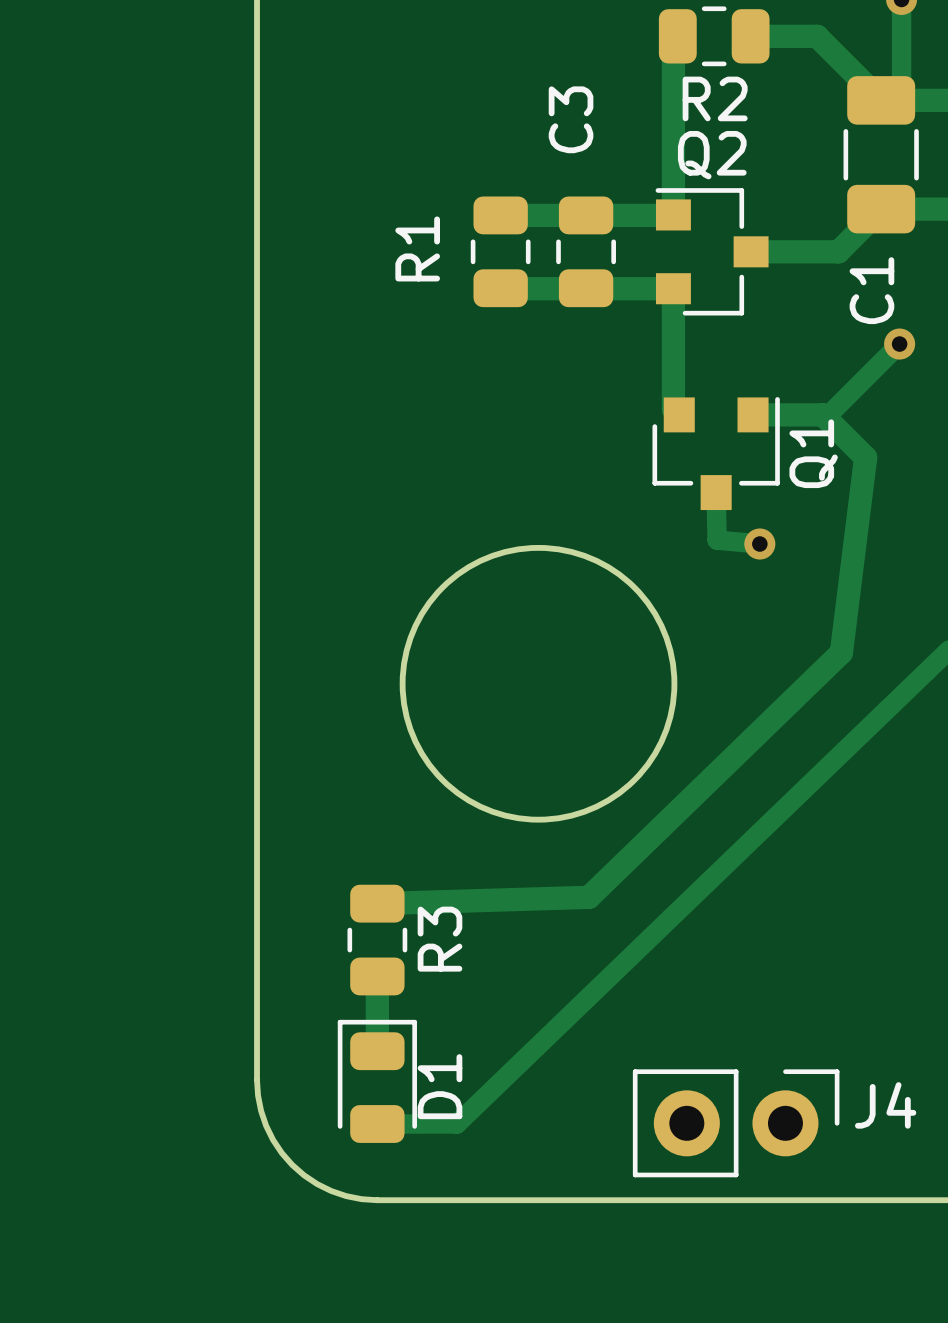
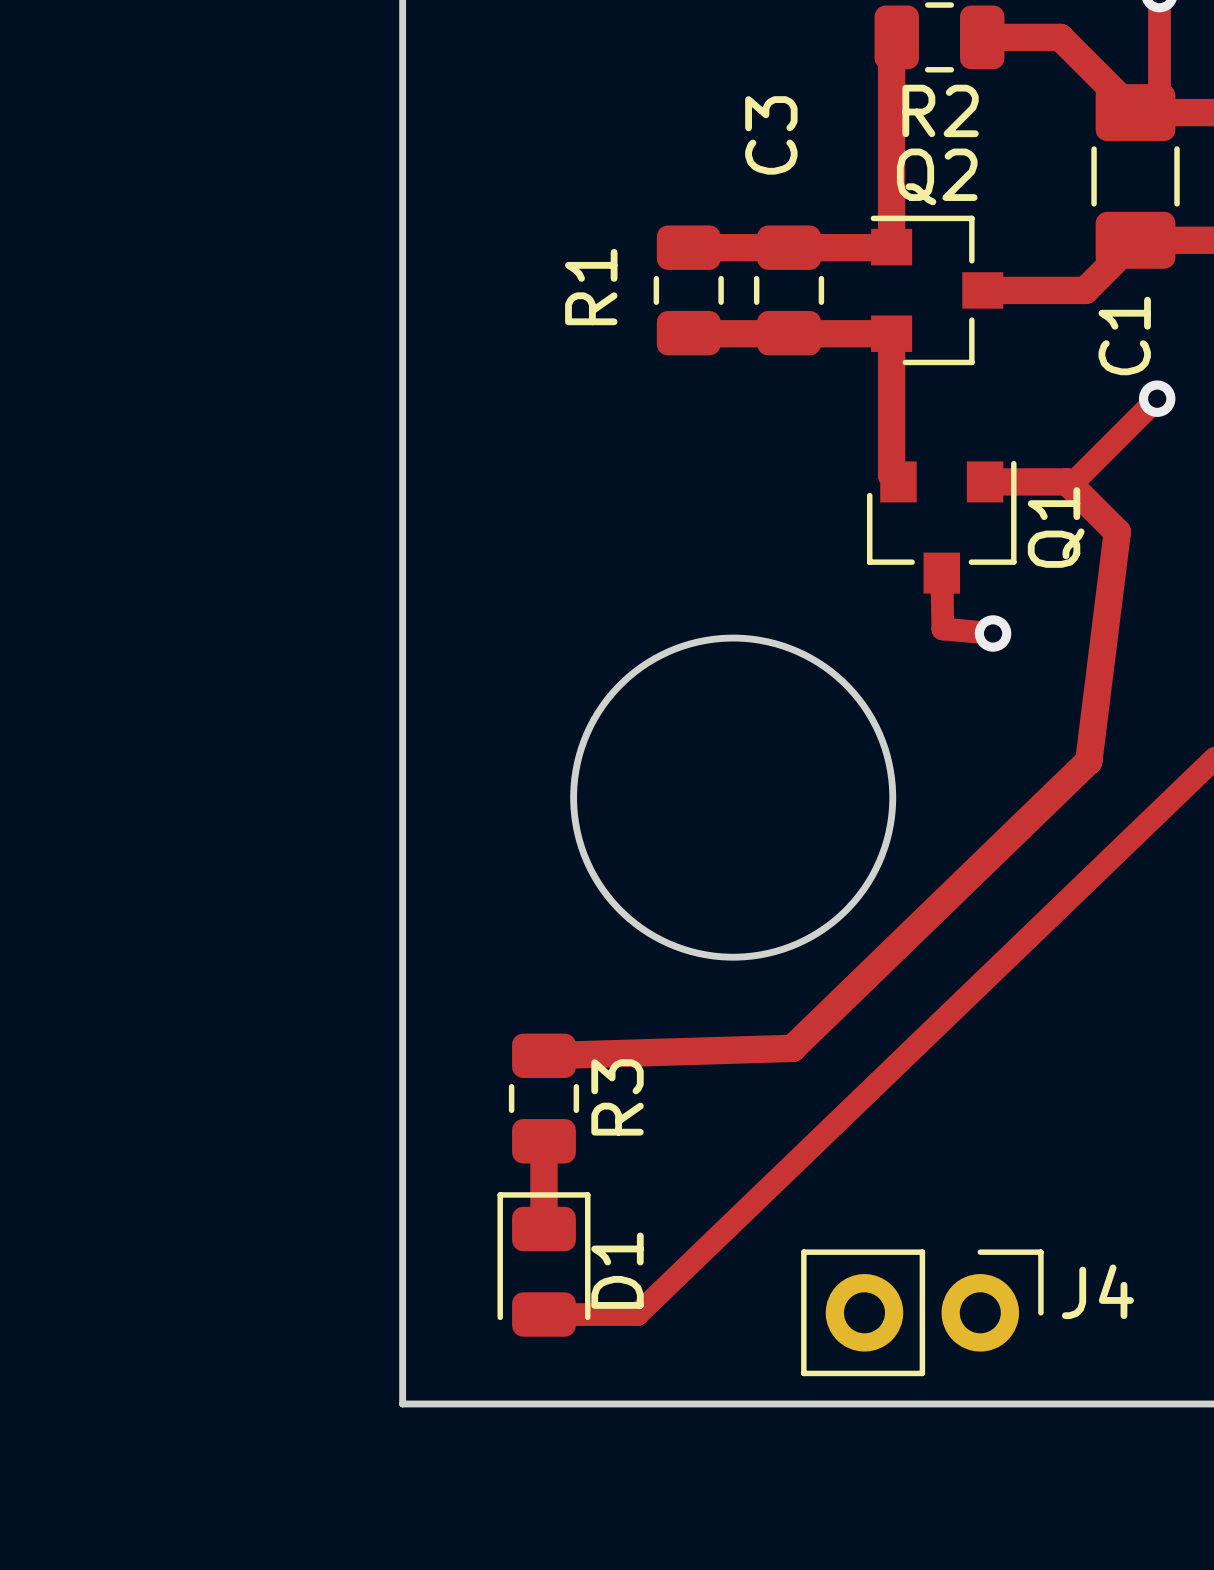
board edge: (257, 1079) (261, 1110) (266, 1125) (281, 1153) (292, 1164) (304, 1175) (331, 1191) (346, 1196) (377, 1200) -> (402, 1262) (402, 1403) (543, 1403)
J4 position: (736, 1123) -> (922, 1312)

